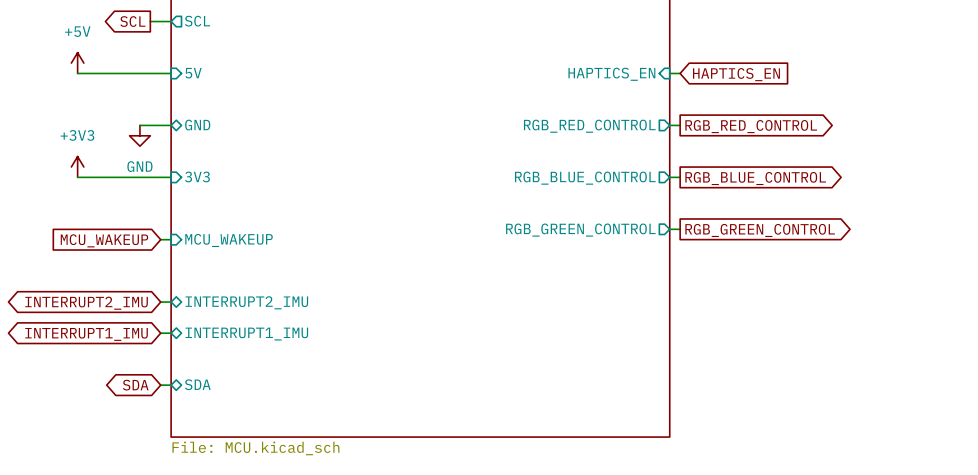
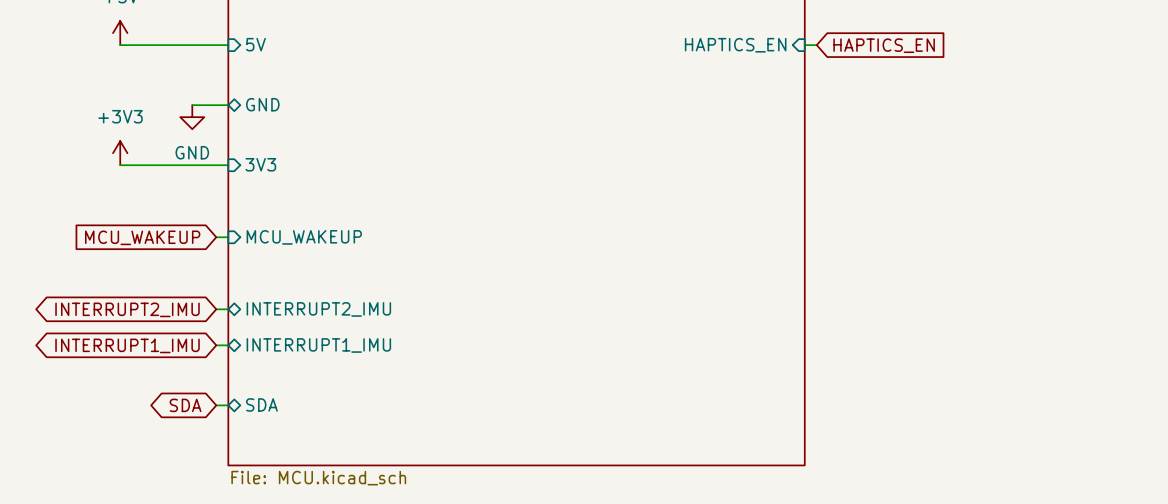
wire: (669, 125) (680, 125) -> none
sheet pin: RGB_RED_CONTROL (589, 126) -> none
global label: RGB_RED_CONTROL (751, 126) -> none
wire: (669, 177) (680, 177) -> none
sheet pin: RGB_BLUE_CONTROL (585, 178) -> none
global label: RGB_BLUE_CONTROL (755, 178) -> none
wire: (669, 229) (680, 229) -> none
sheet pin: RGB_GREEN_CONTROL (580, 230) -> none
global label: RGB_GREEN_CONTROL (760, 230) -> none

